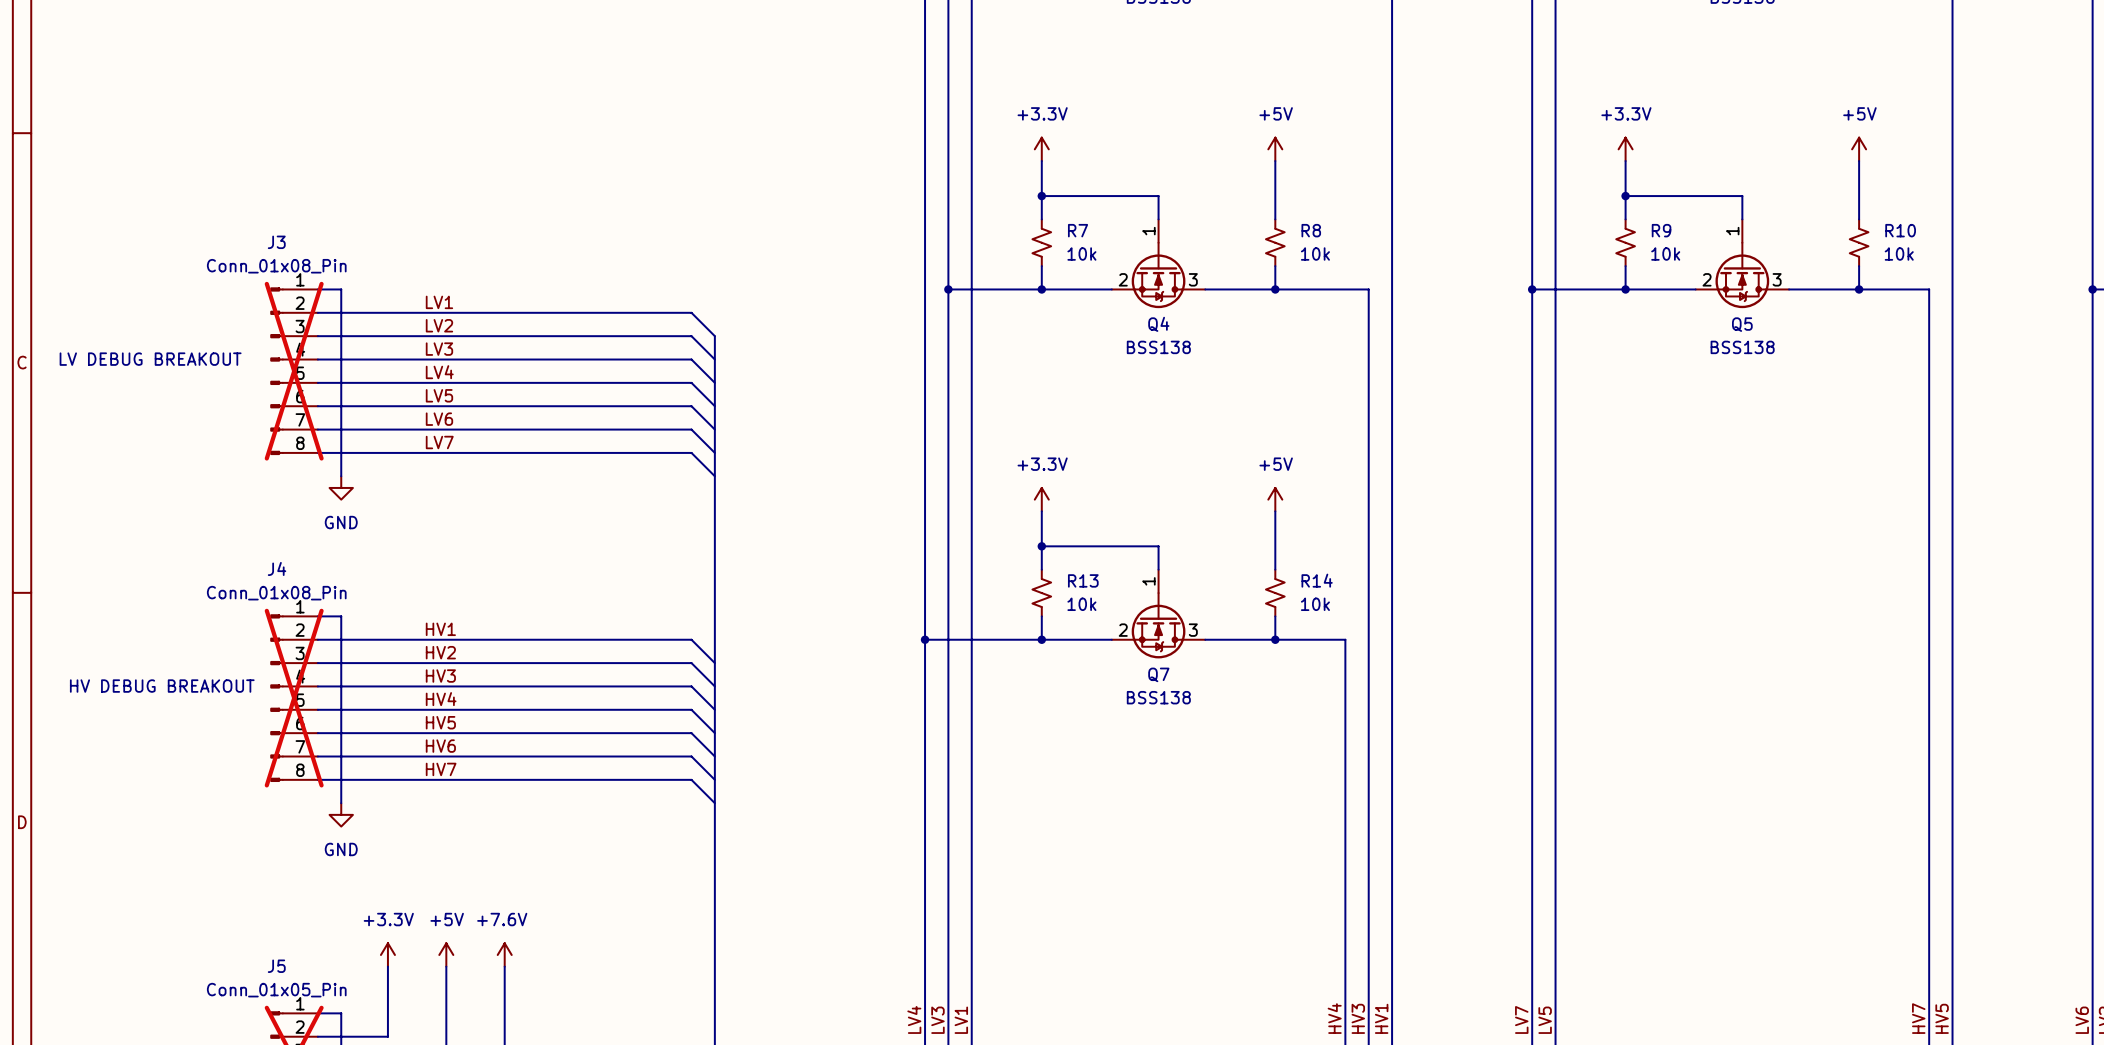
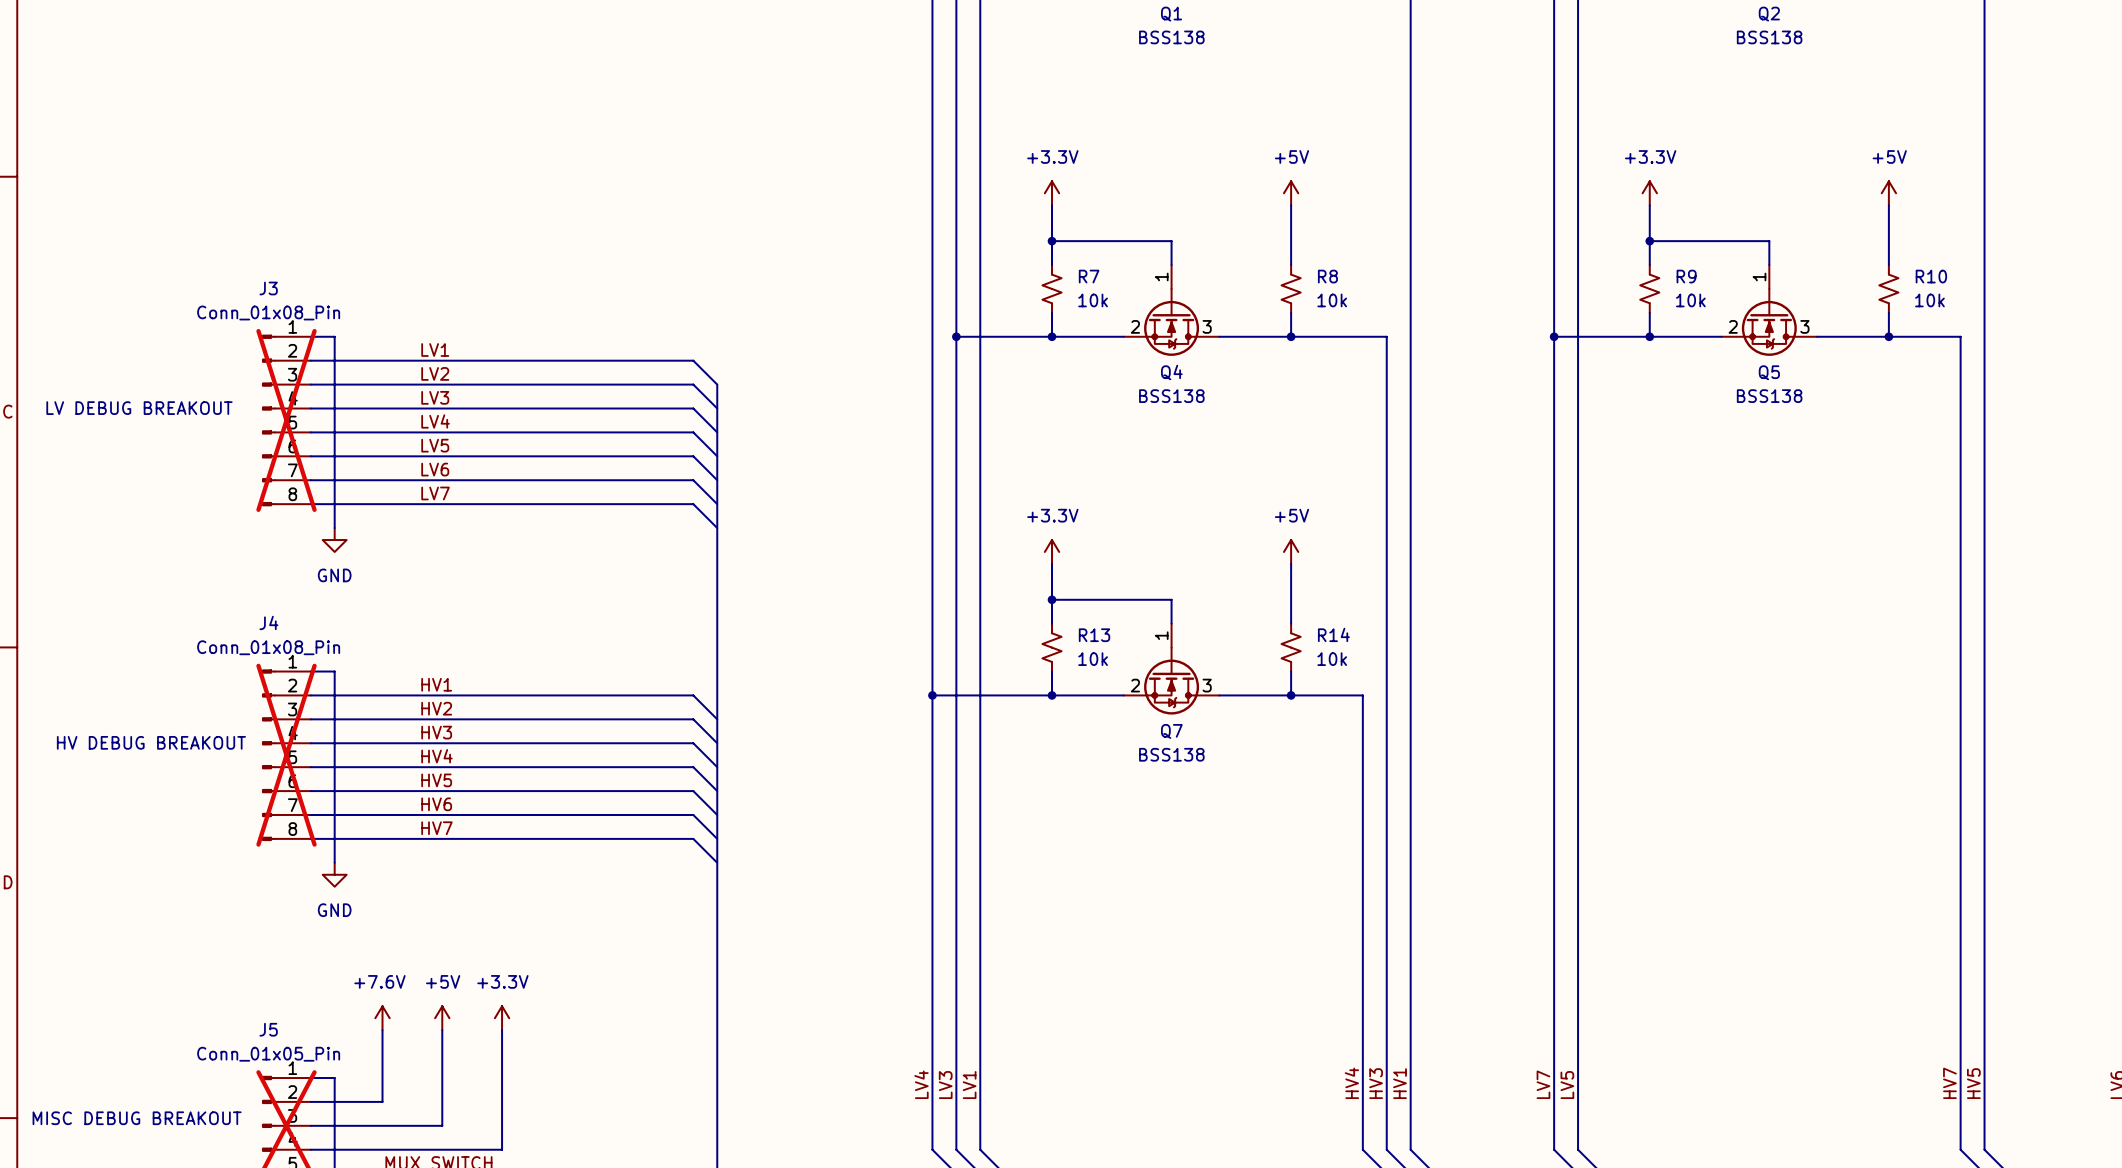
power symbol: +3.3V (387, 954) -> +7.6V (382, 1018)
power symbol: +7.6V (504, 954) -> +3.3V (502, 1018)

